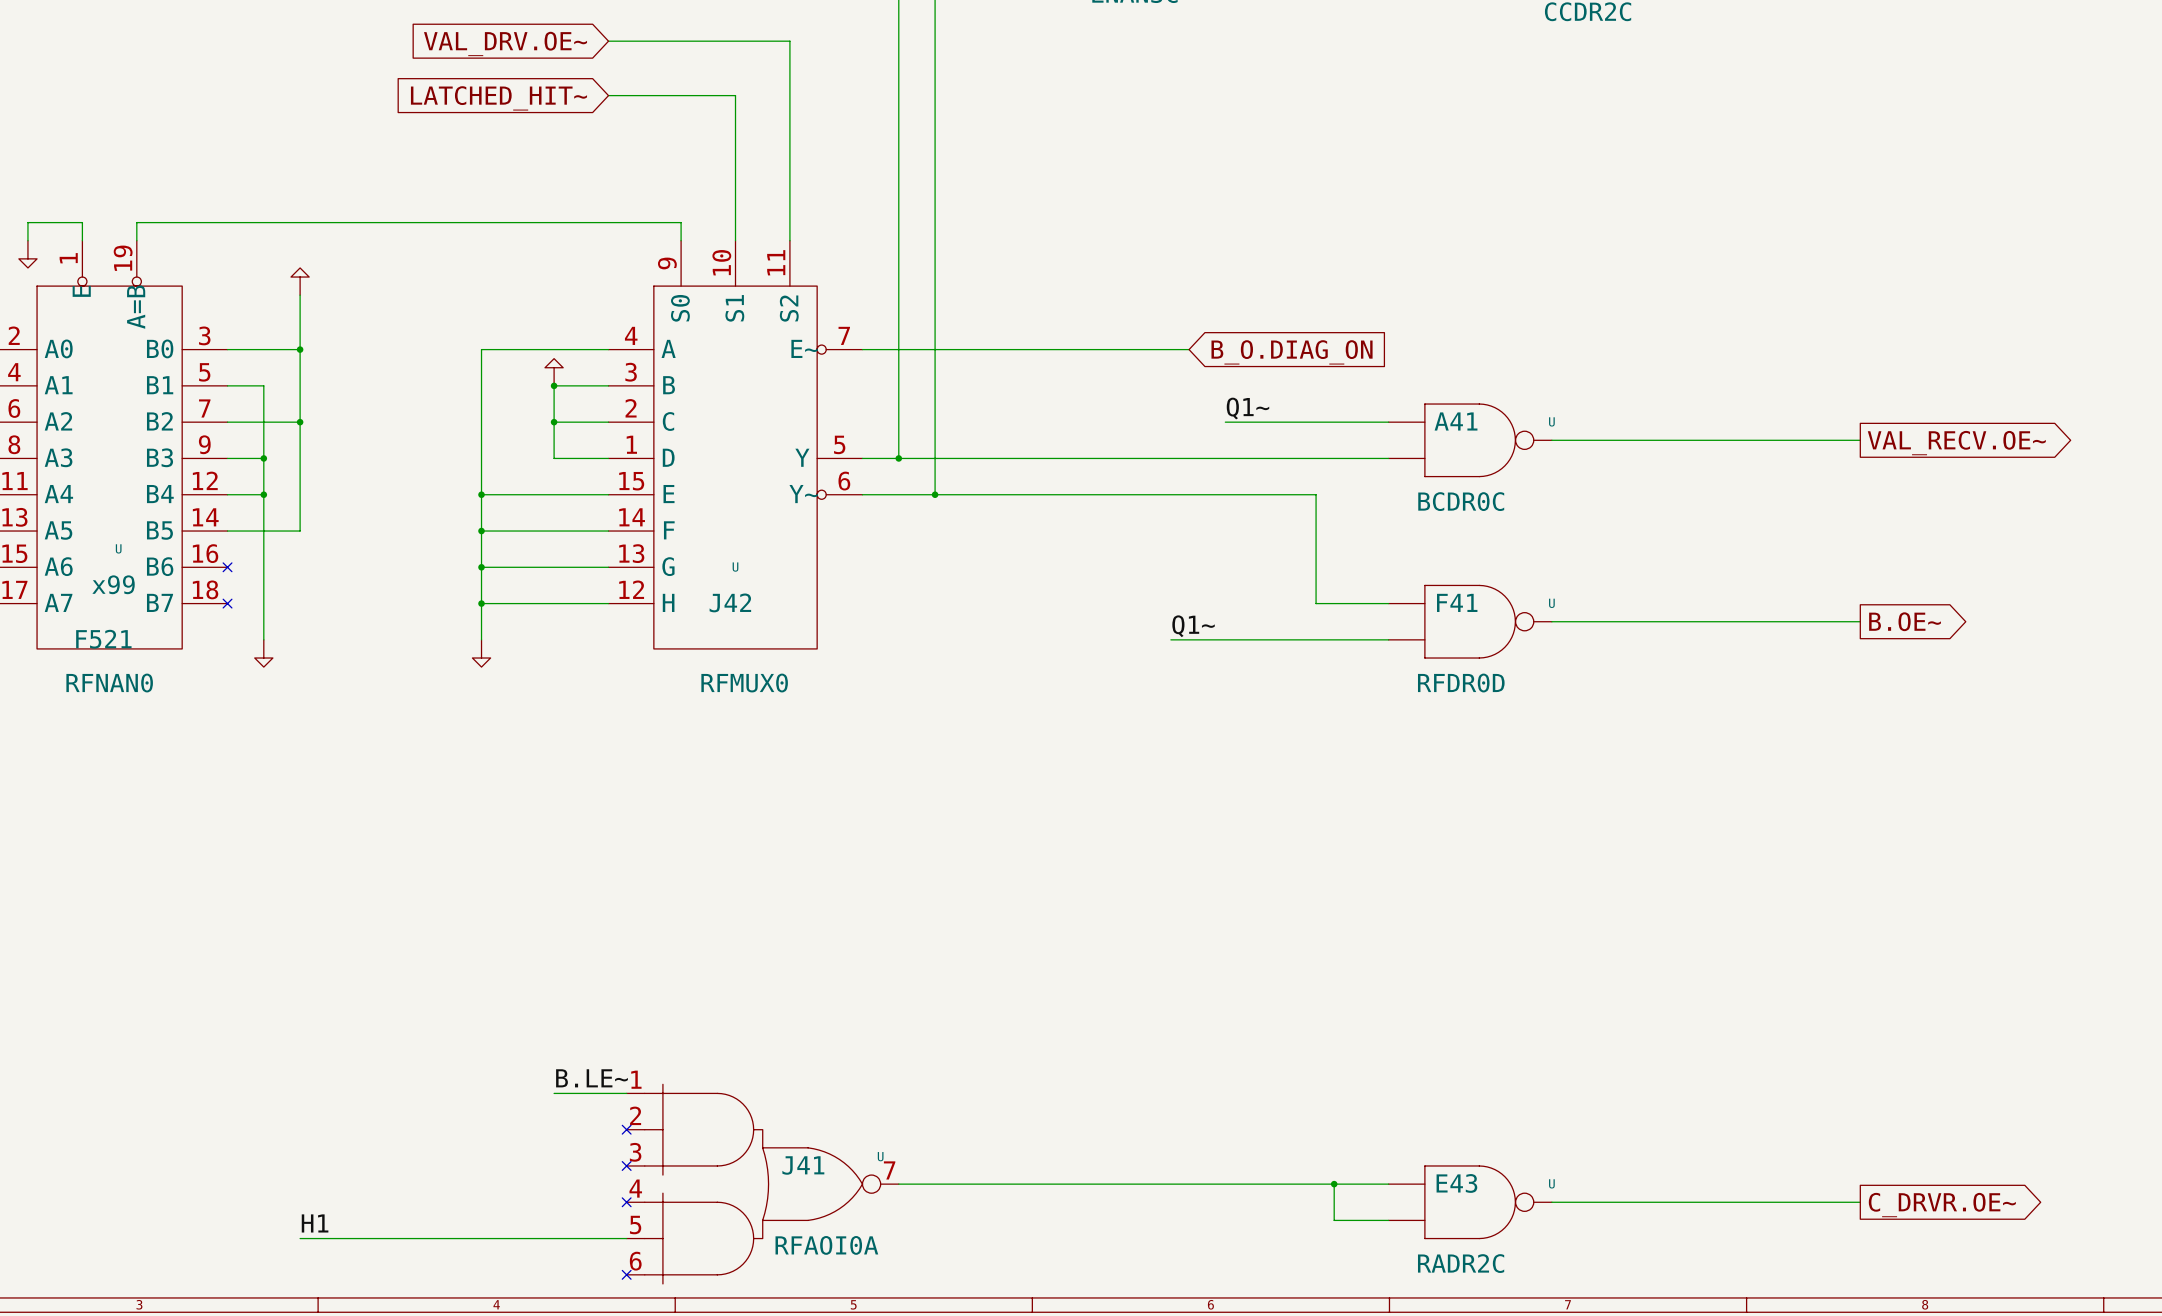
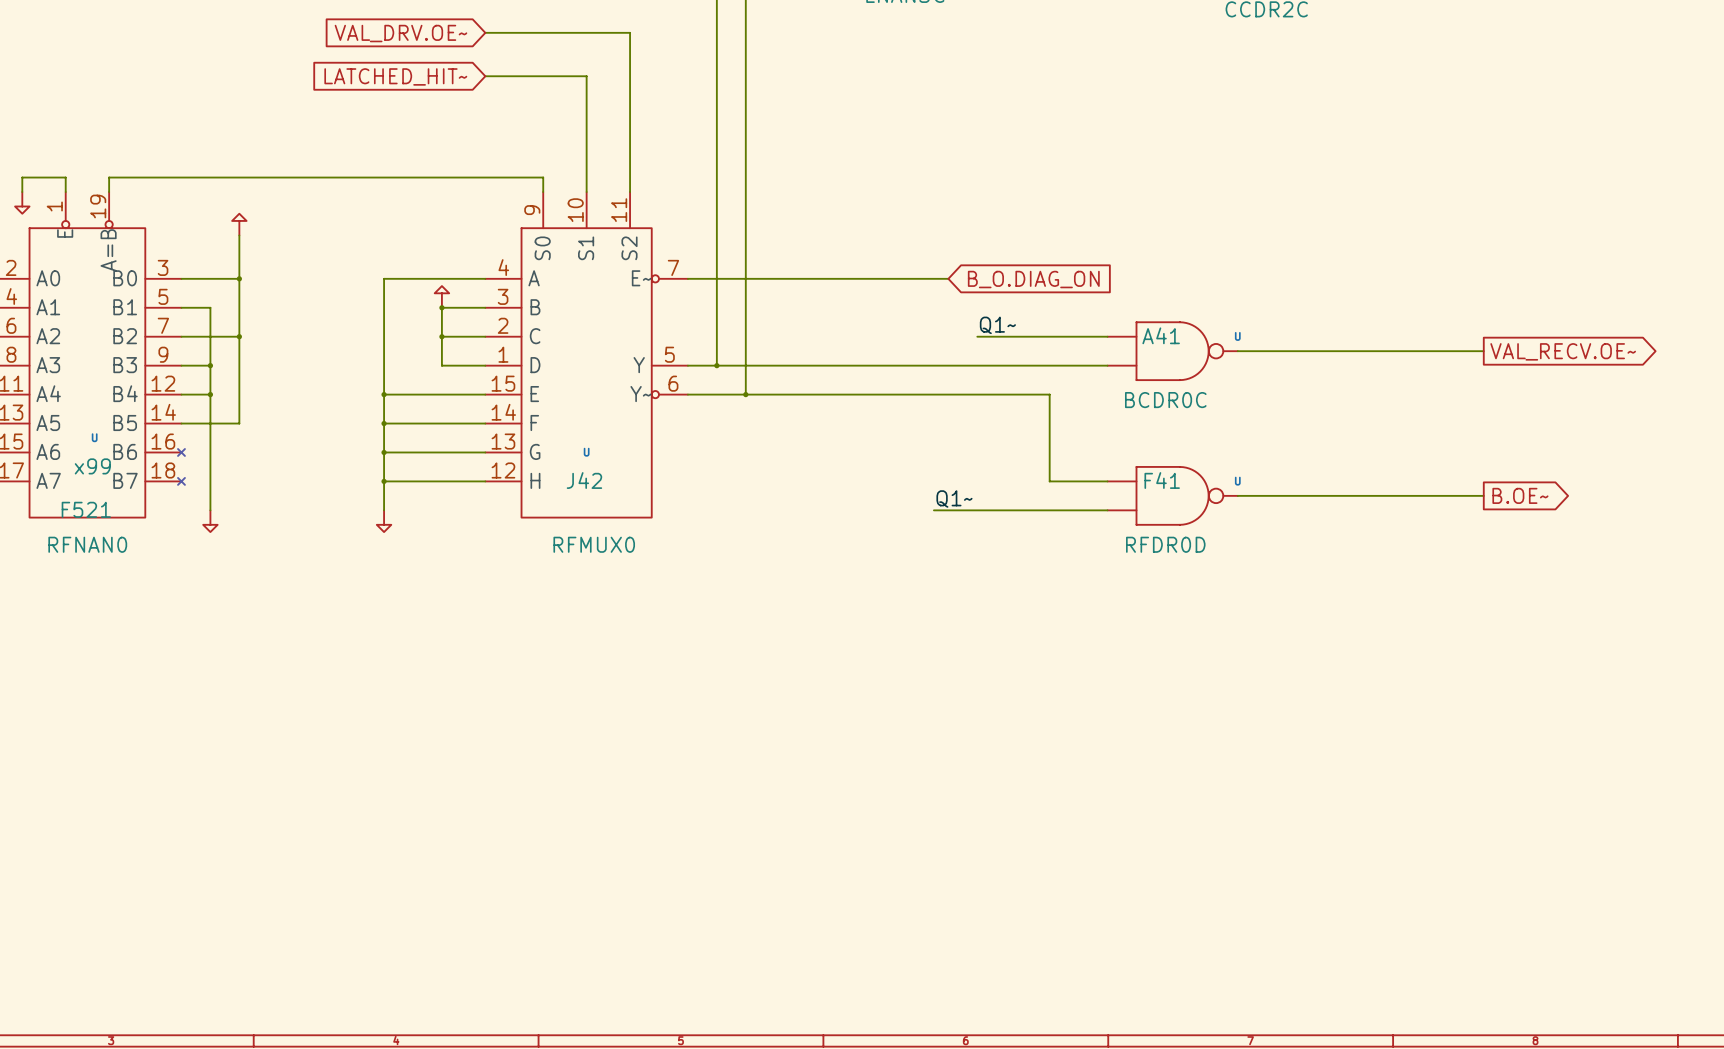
label: B.LE~ (592, 1078) -> none
wire: (554, 1093) (626, 1093) -> none
no-connect mark: (626, 1129) -> none
no-connect mark: (626, 1165) -> none
U: (762, 1184) -> none
wire: (898, 1184) (1388, 1184) -> none
wire: (1334, 1184) (1334, 1220) (1388, 1220) -> none
junction: (1334, 1184) -> none
no-connect mark: (626, 1202) -> none
U: (1470, 1202) -> none
wire: (1551, 1202) (1860, 1202) -> none
global label: C_DRVR.OE~ (1942, 1205) -> none
label: H1 (315, 1223) -> none
wire: (300, 1238) (626, 1238) -> none
no-connect mark: (626, 1274) -> none

